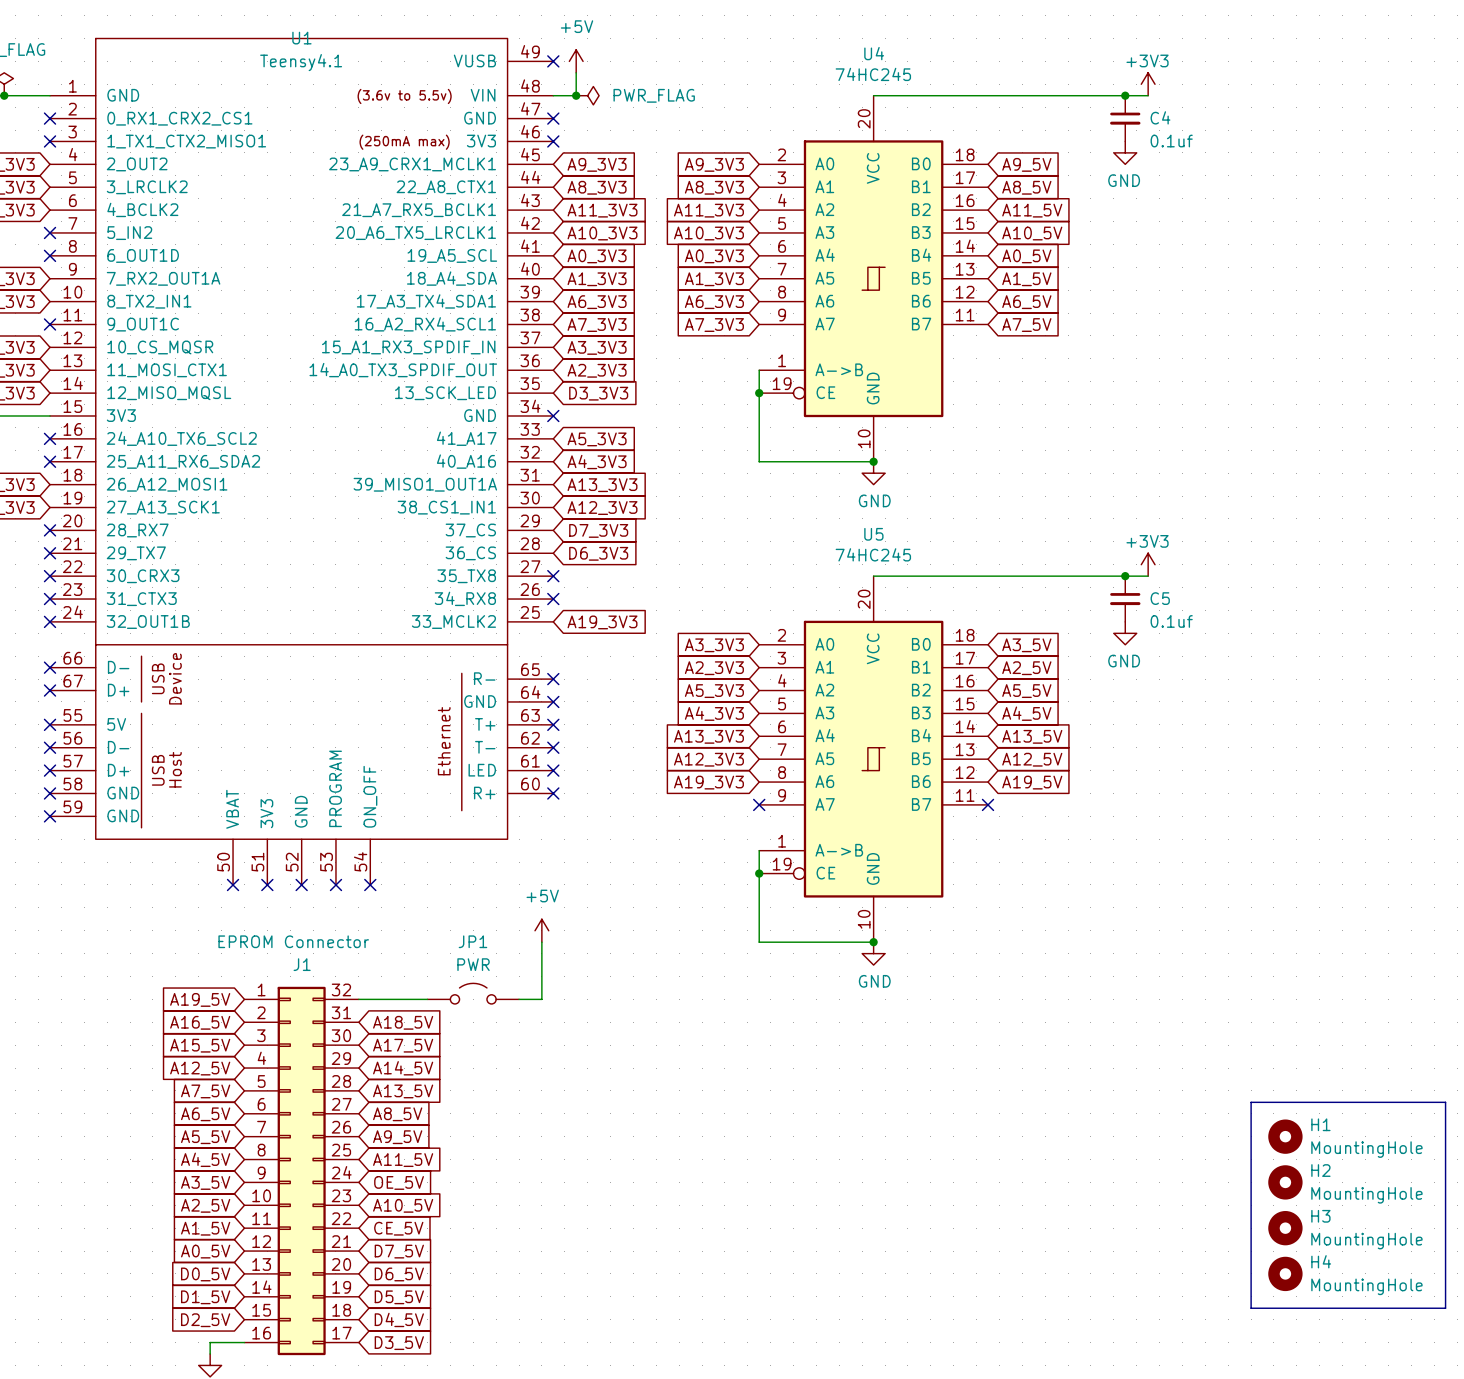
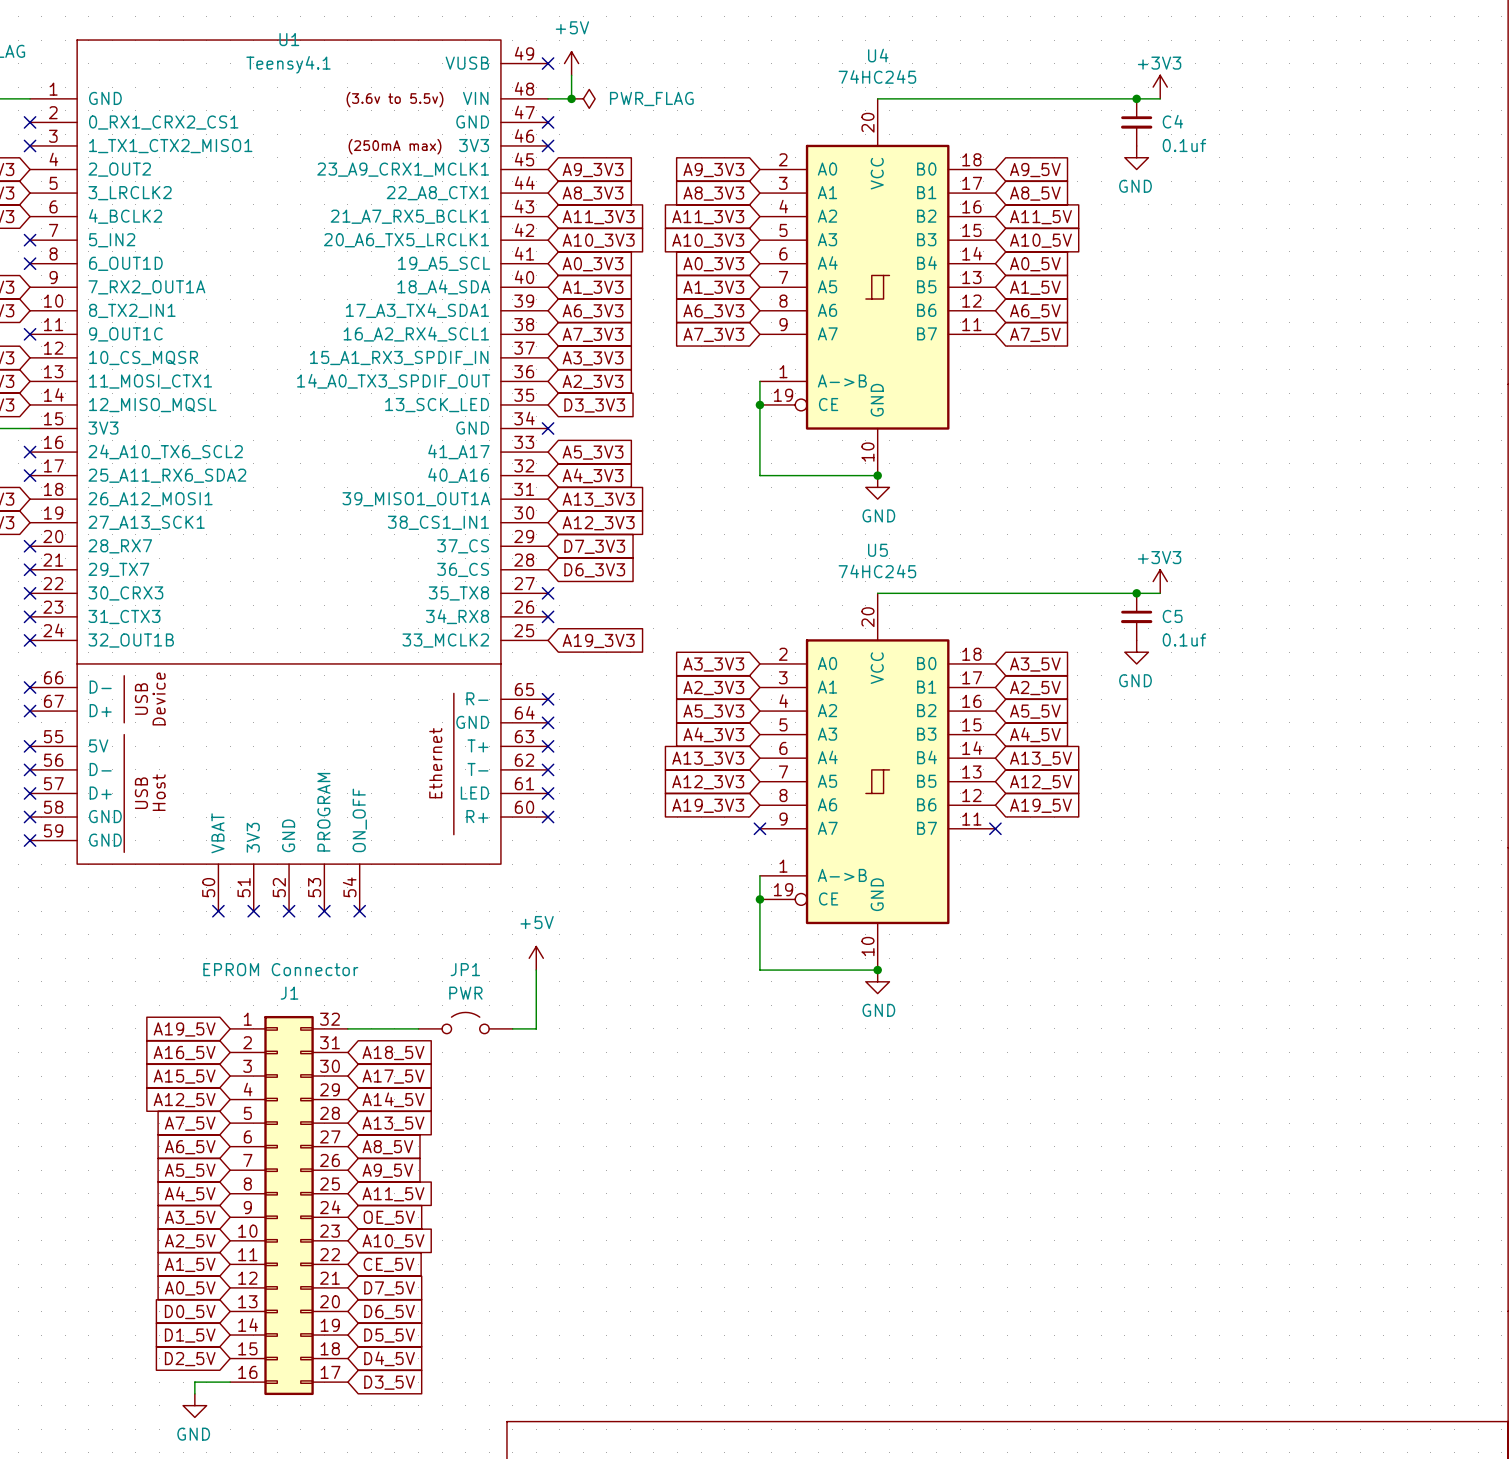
line: (1251, 1102) (1445, 1102) (1445, 1308) (1251, 1308) (1251, 1102) -> none
H1: MountingHole (1285, 1136) -> none
H2: MountingHole (1285, 1182) -> none
H3: MountingHole (1285, 1228) -> none
H4: MountingHole (1285, 1273) -> none

